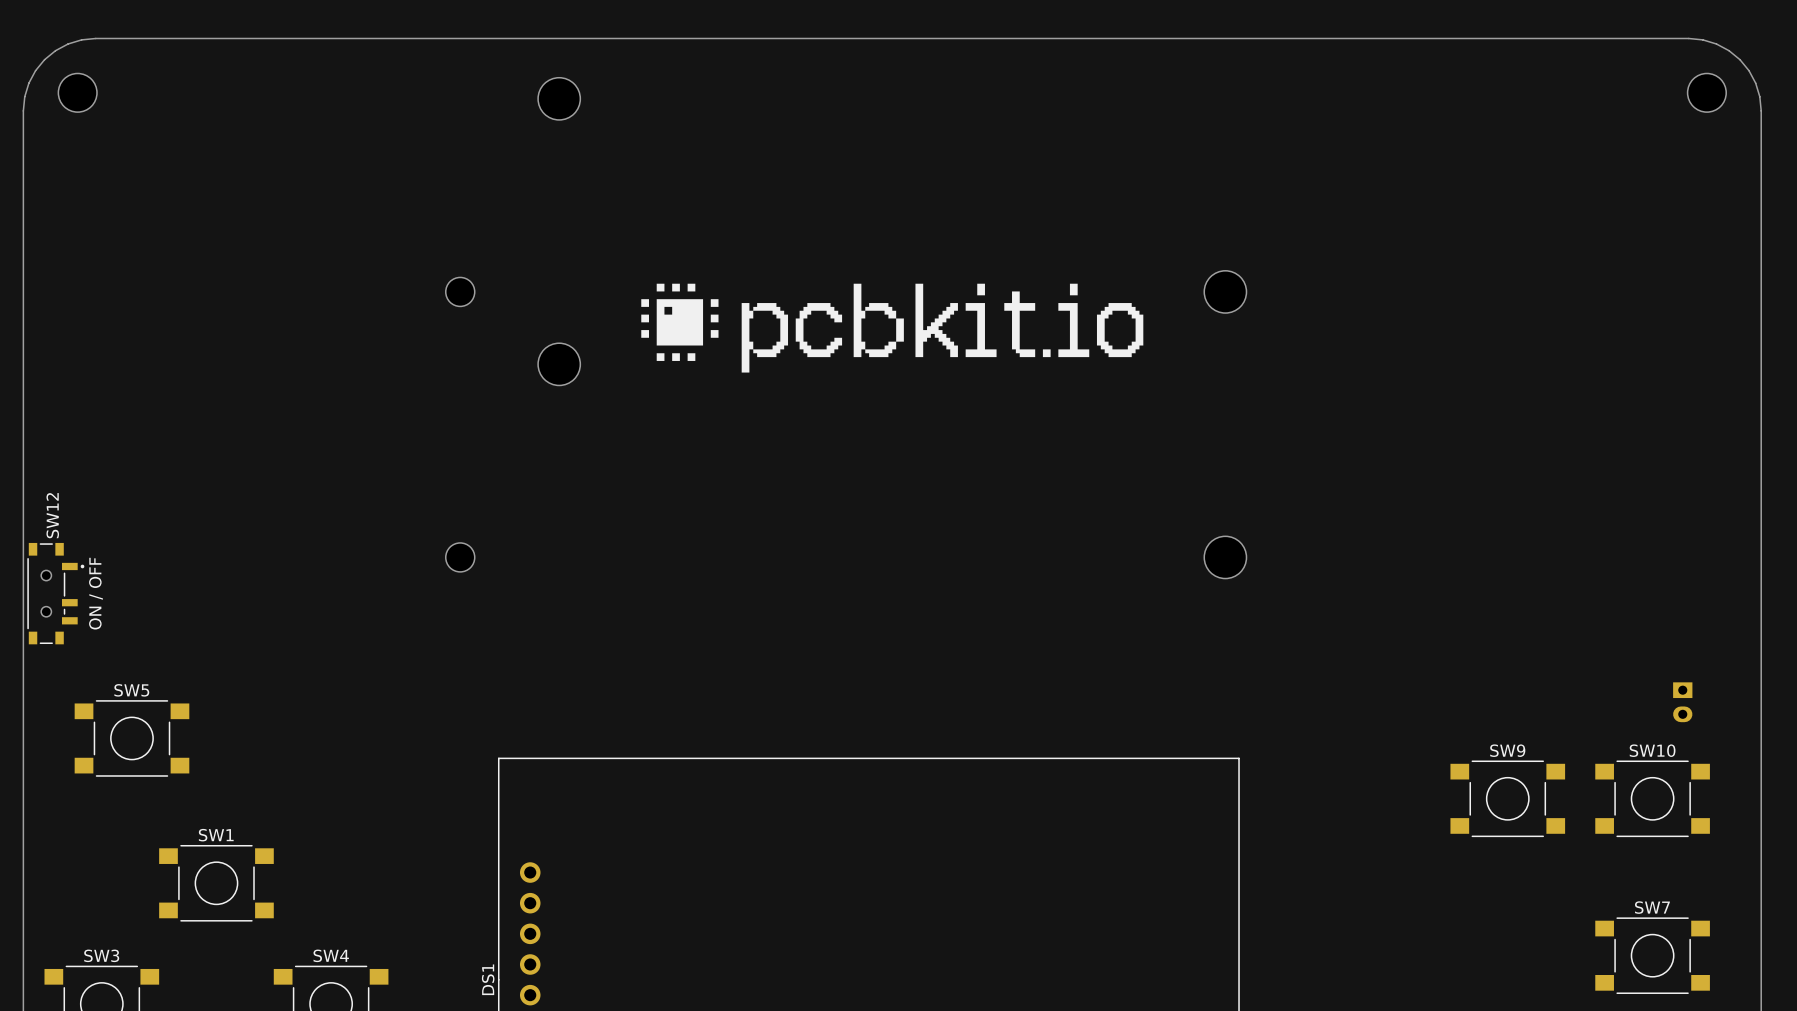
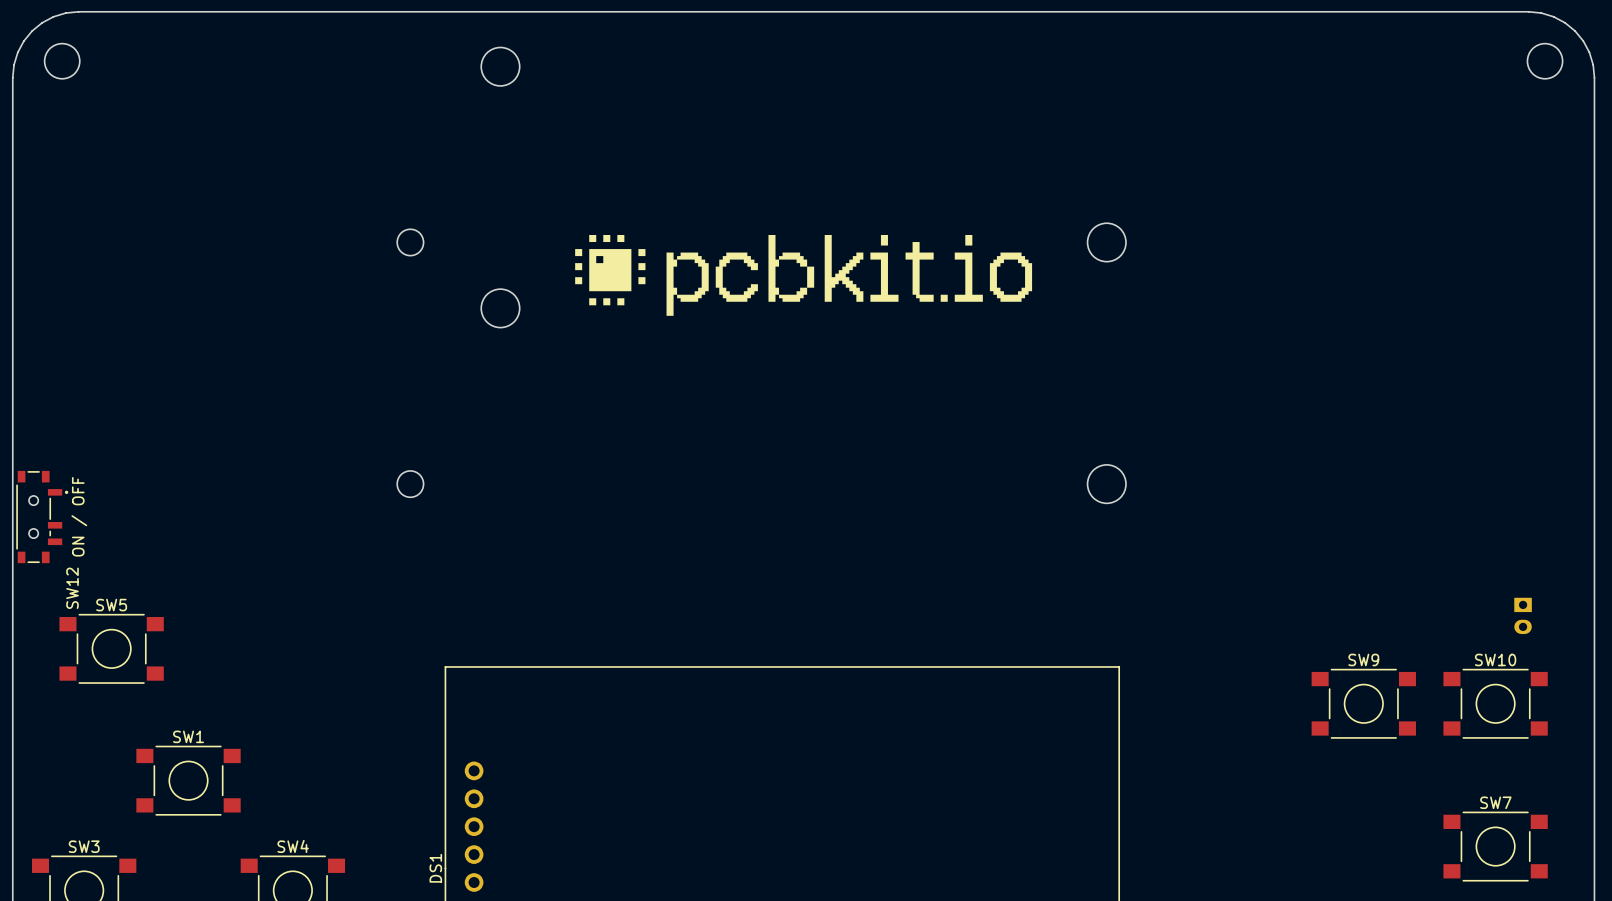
SW12 name position: SW12 (52, 515) -> SW12 (72, 588)

